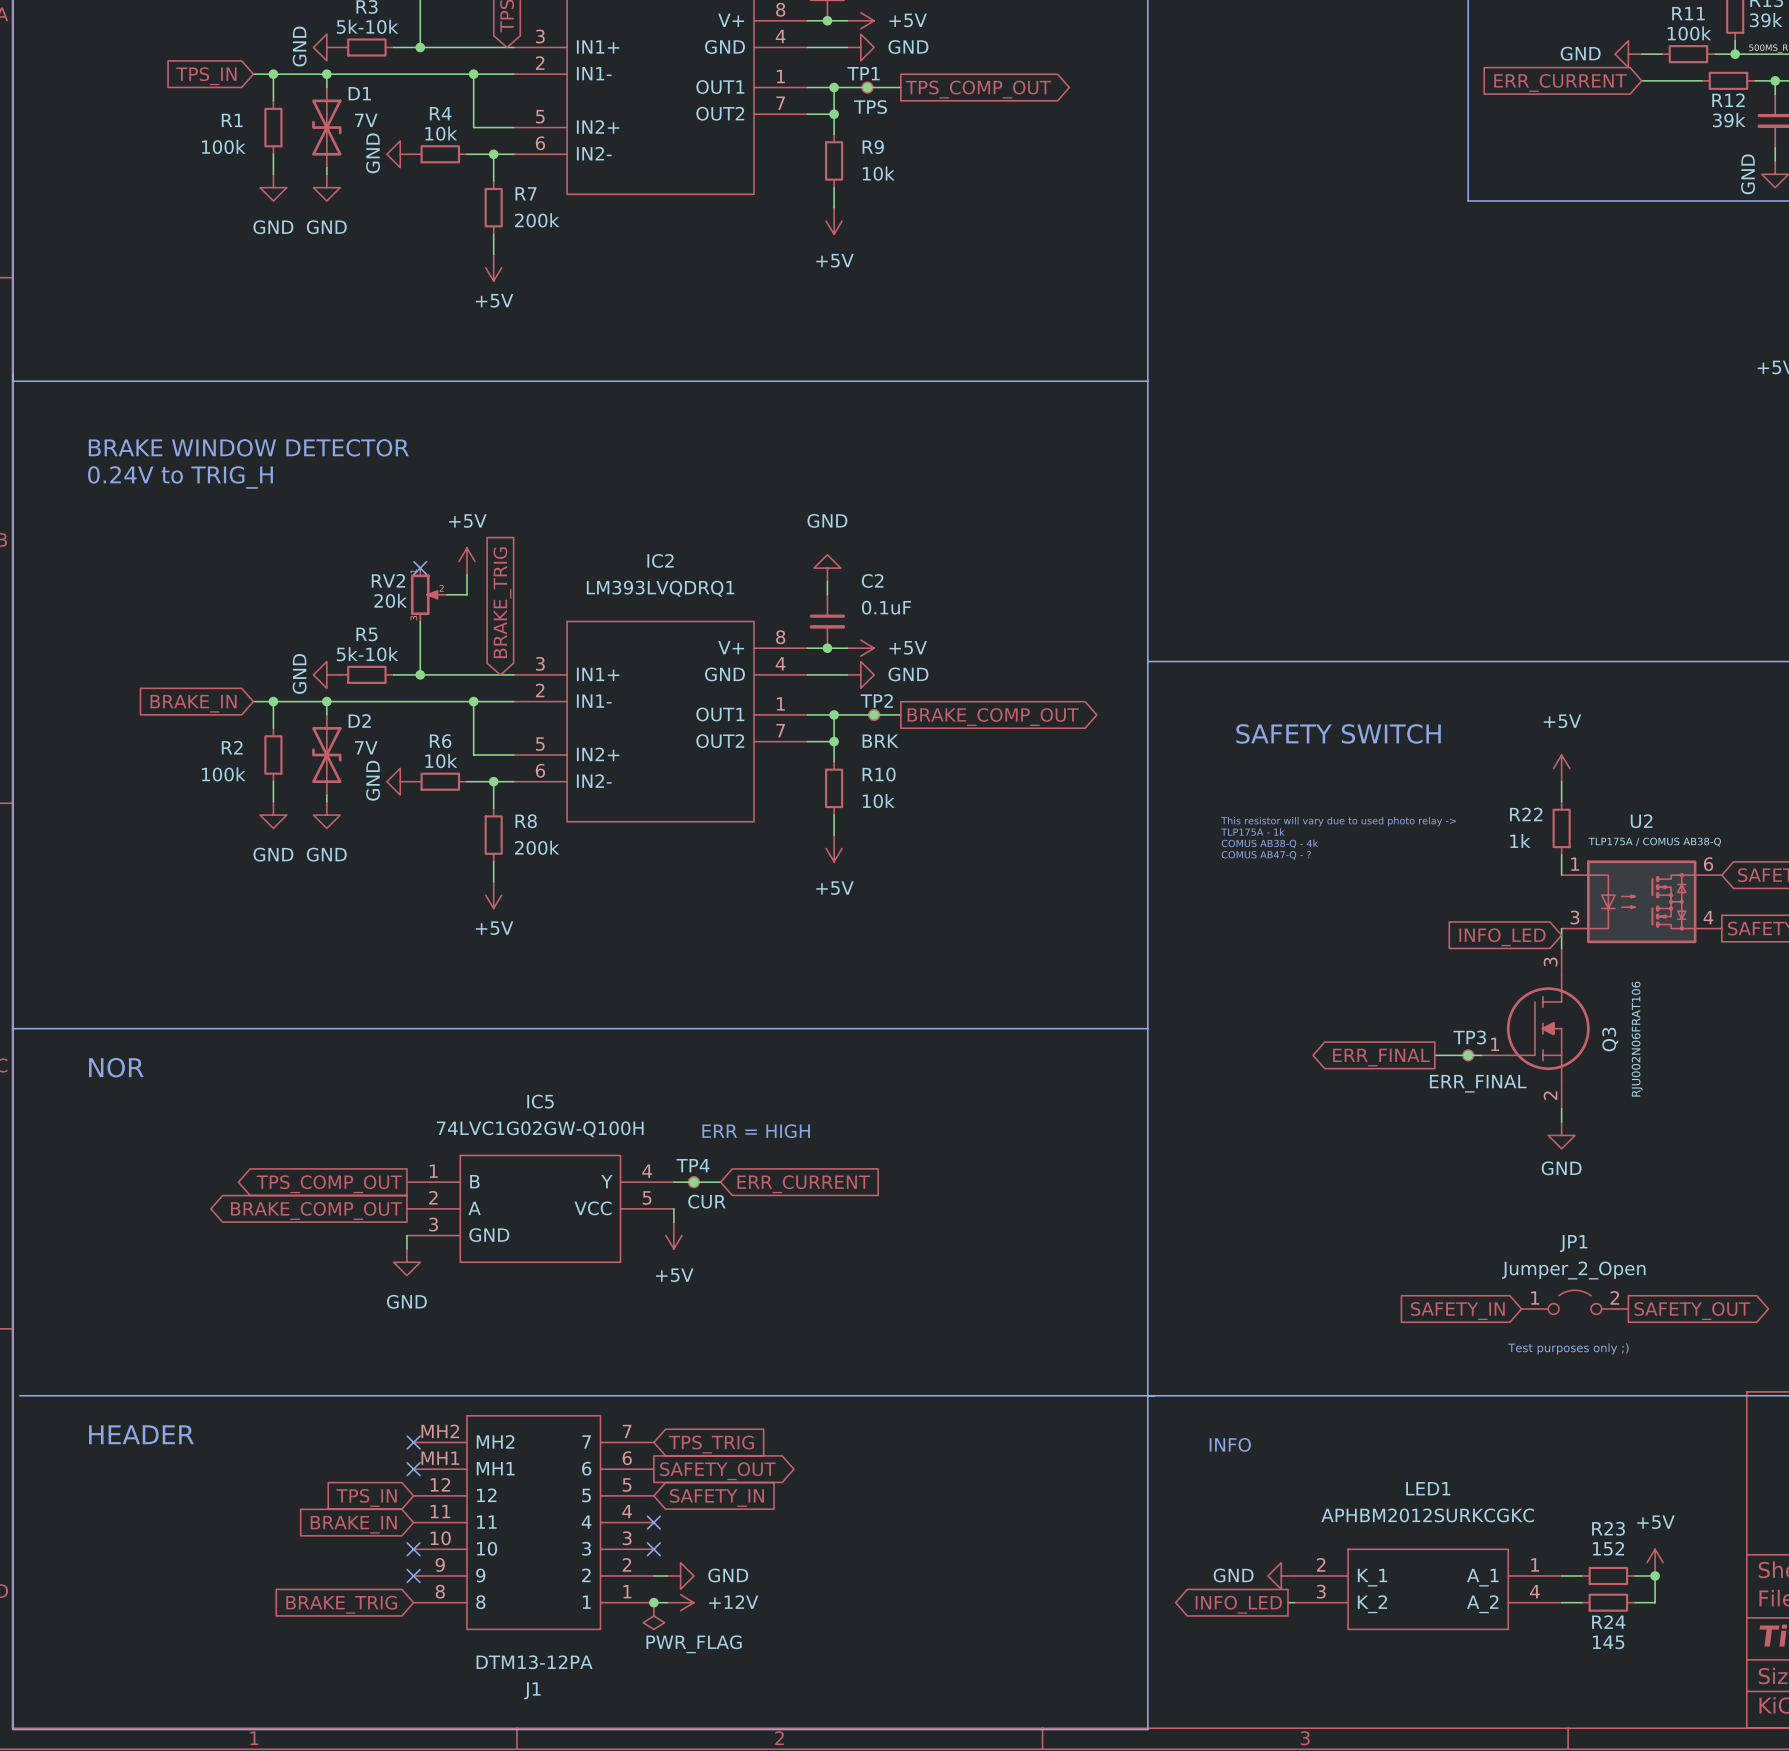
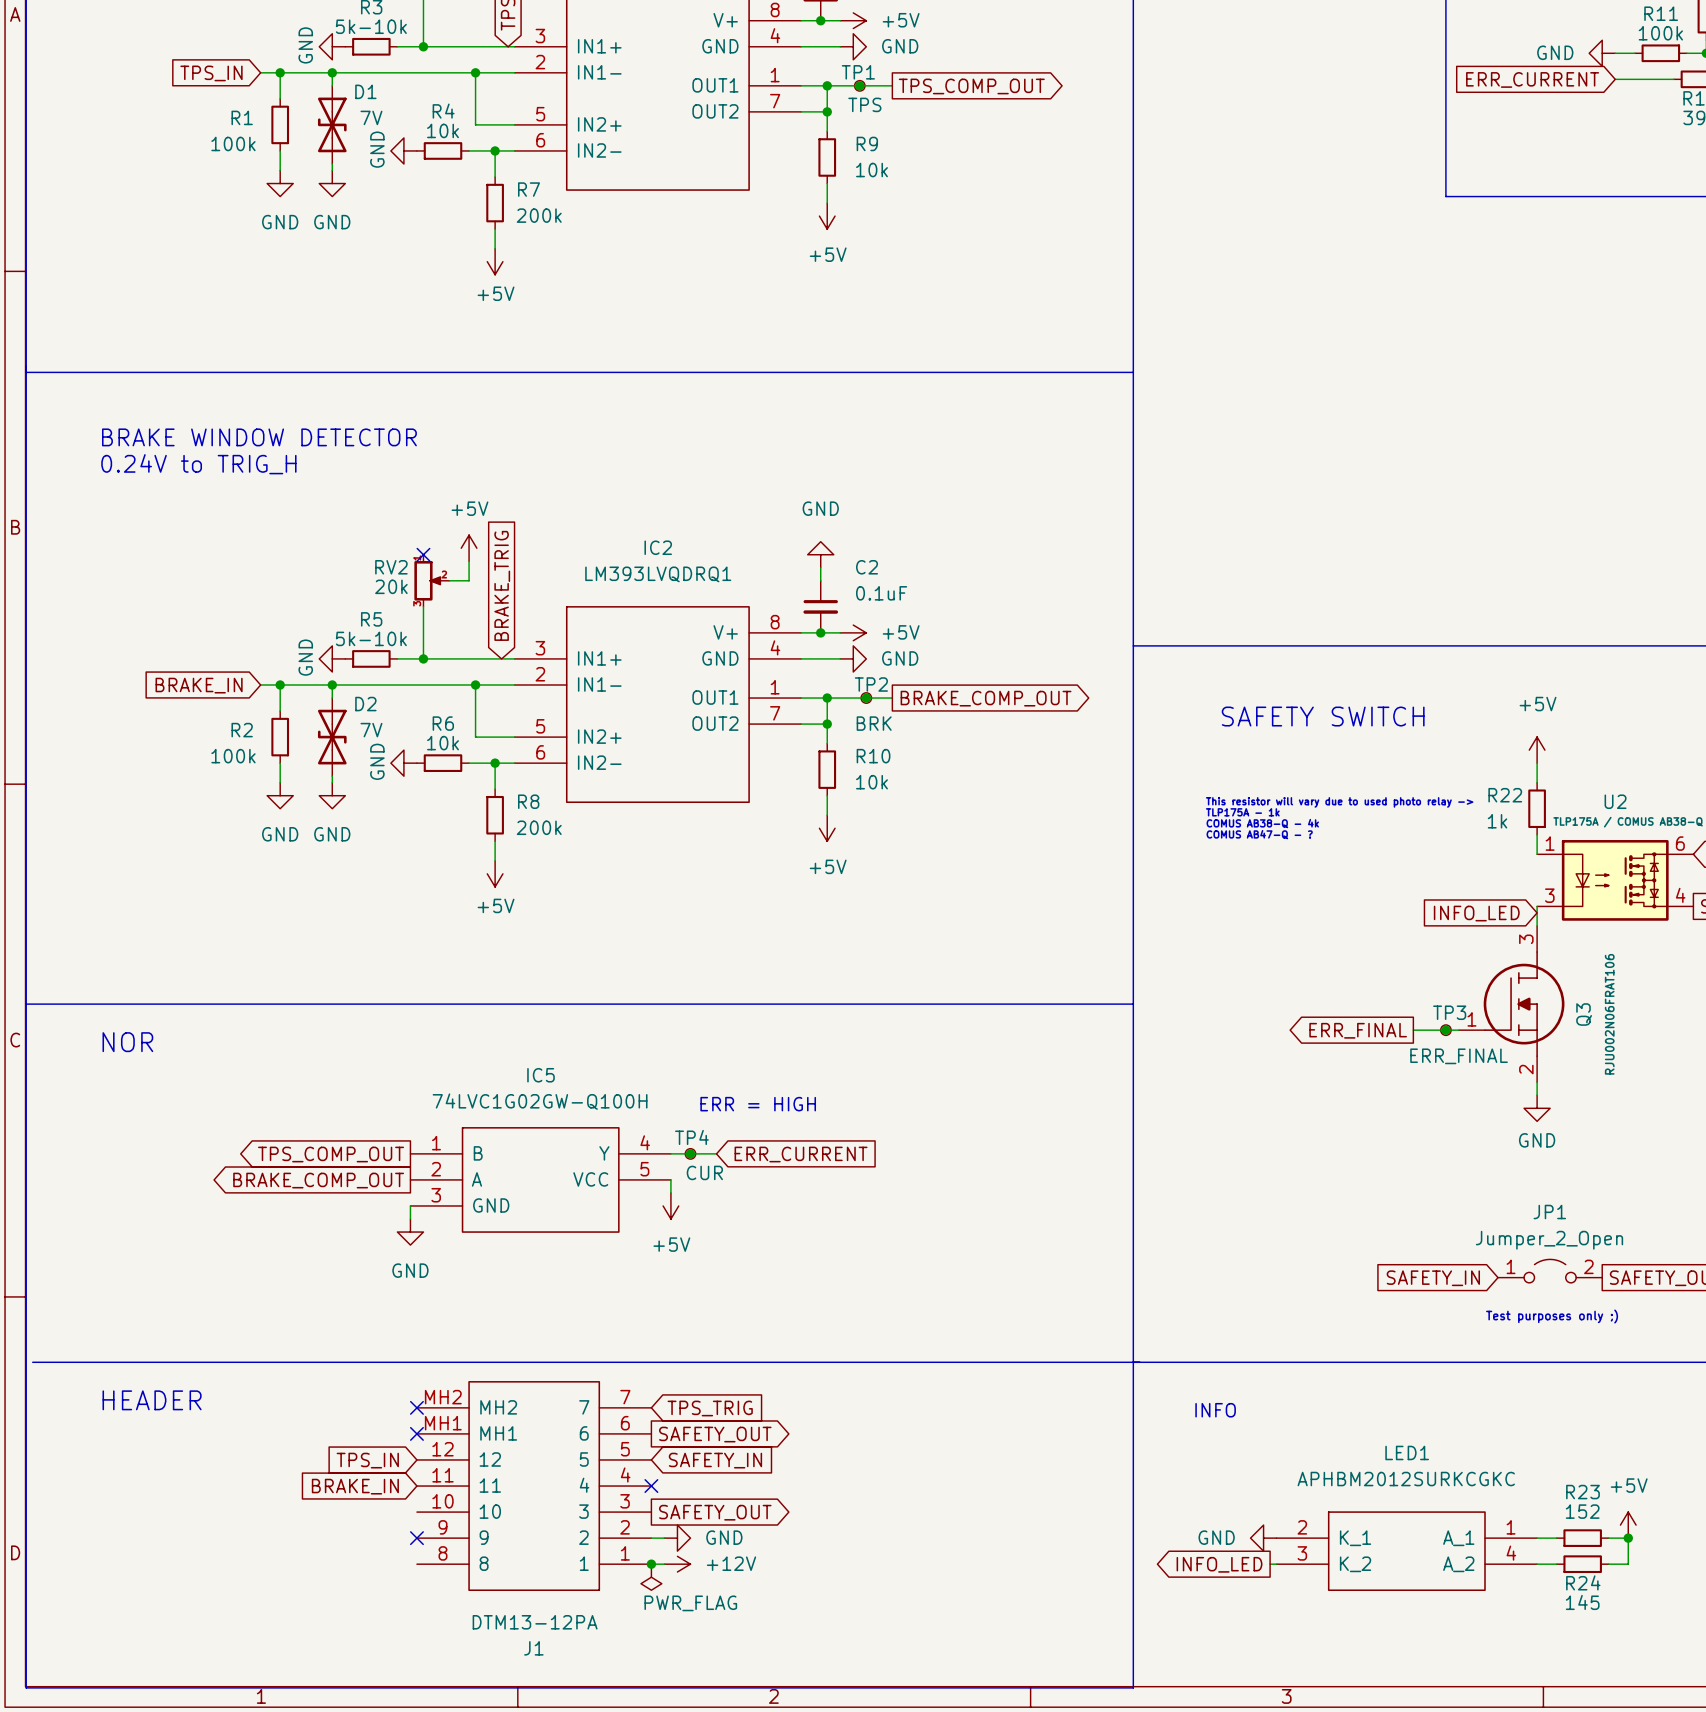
no-connect mark: (413, 1549) -> none
no-connect mark: (653, 1549) -> none
global label: none -> SAFETY_OUT (715, 1512)
global label: BRAKE_TRIG (341, 1604) -> none

